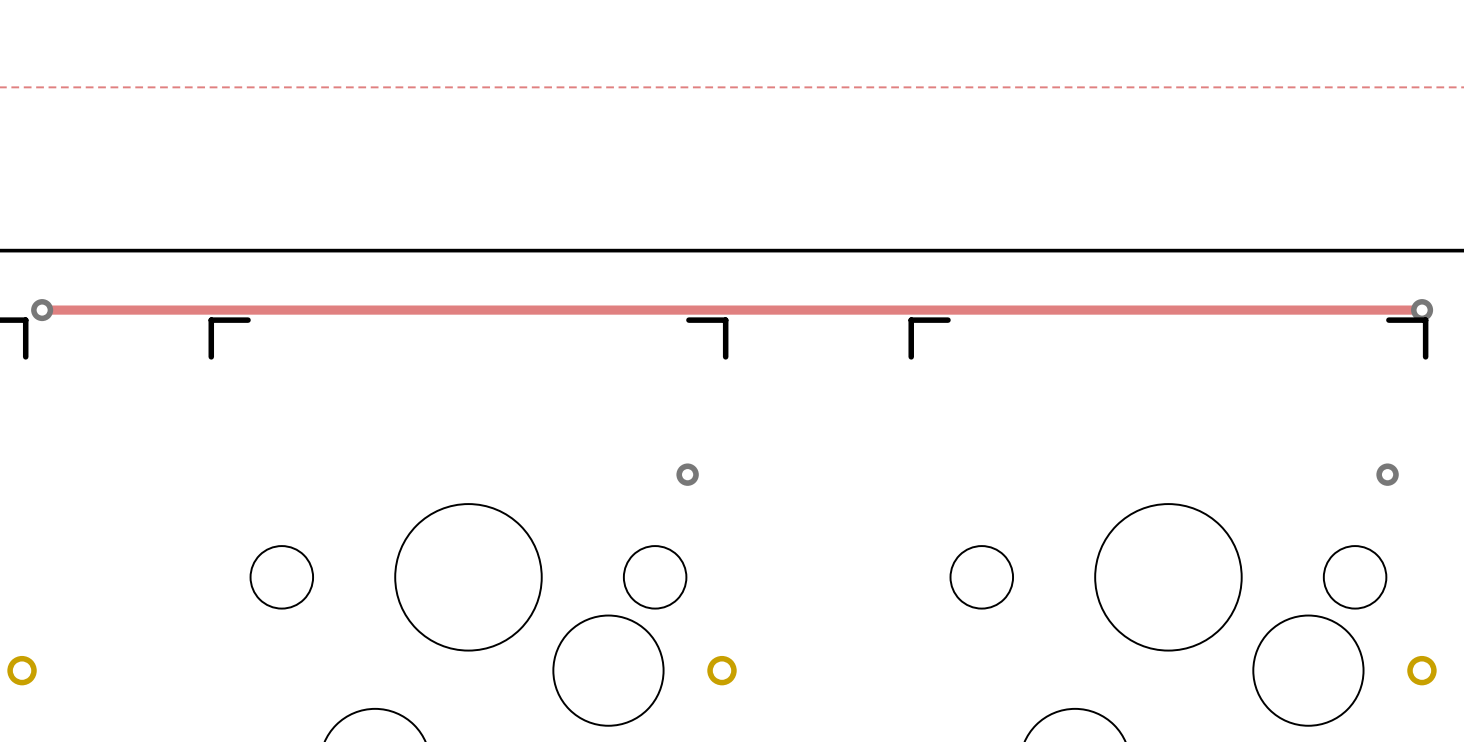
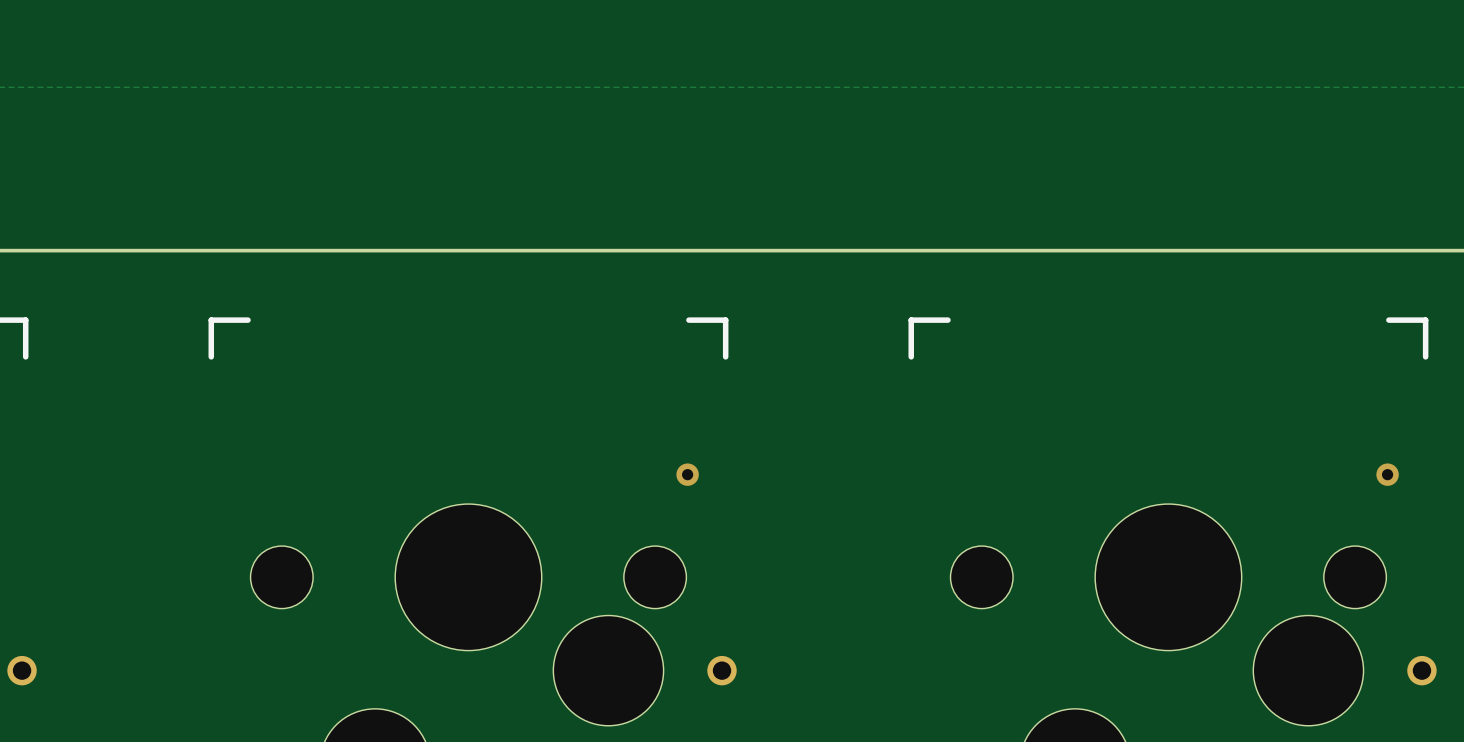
track: (42, 310) (1422, 310) -> none
via: (42, 310) -> none
via: (1422, 310) -> none

